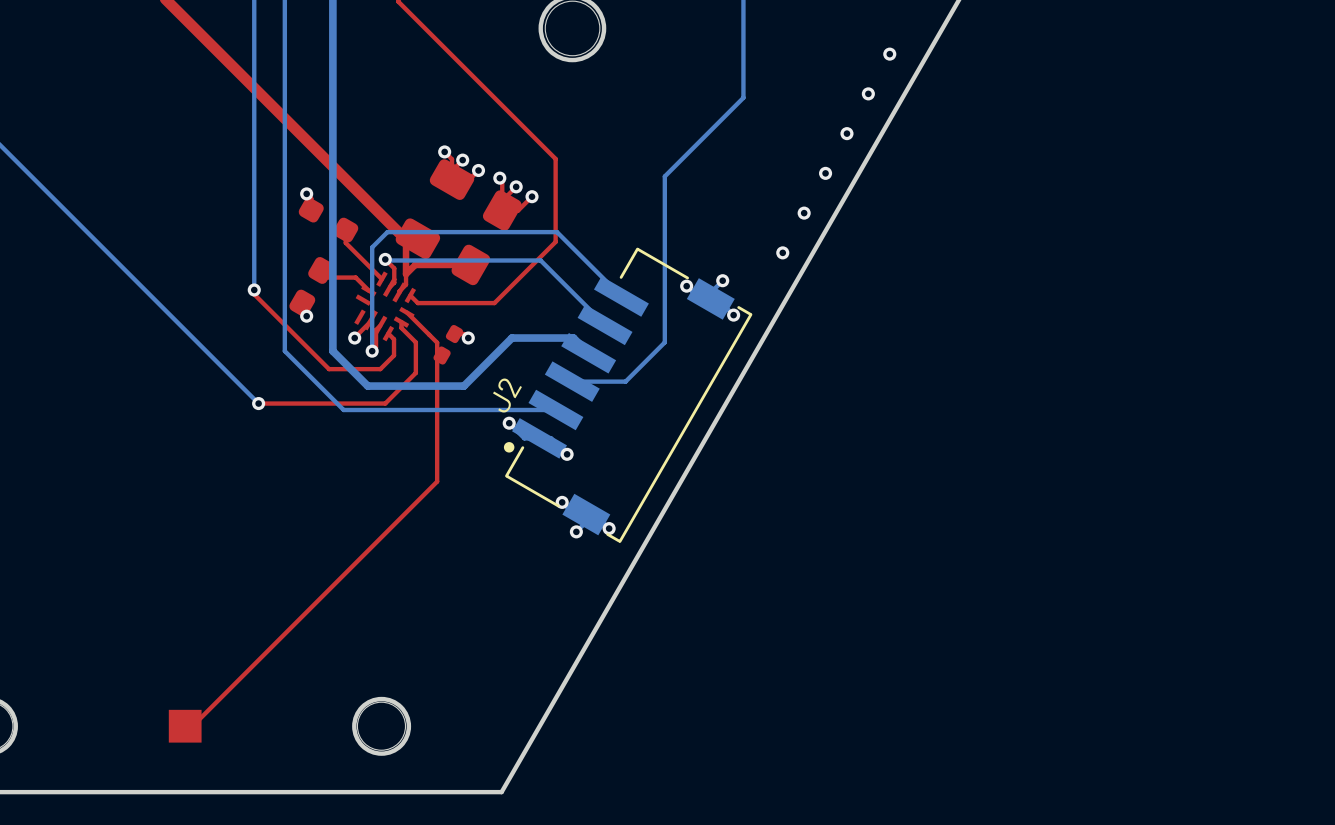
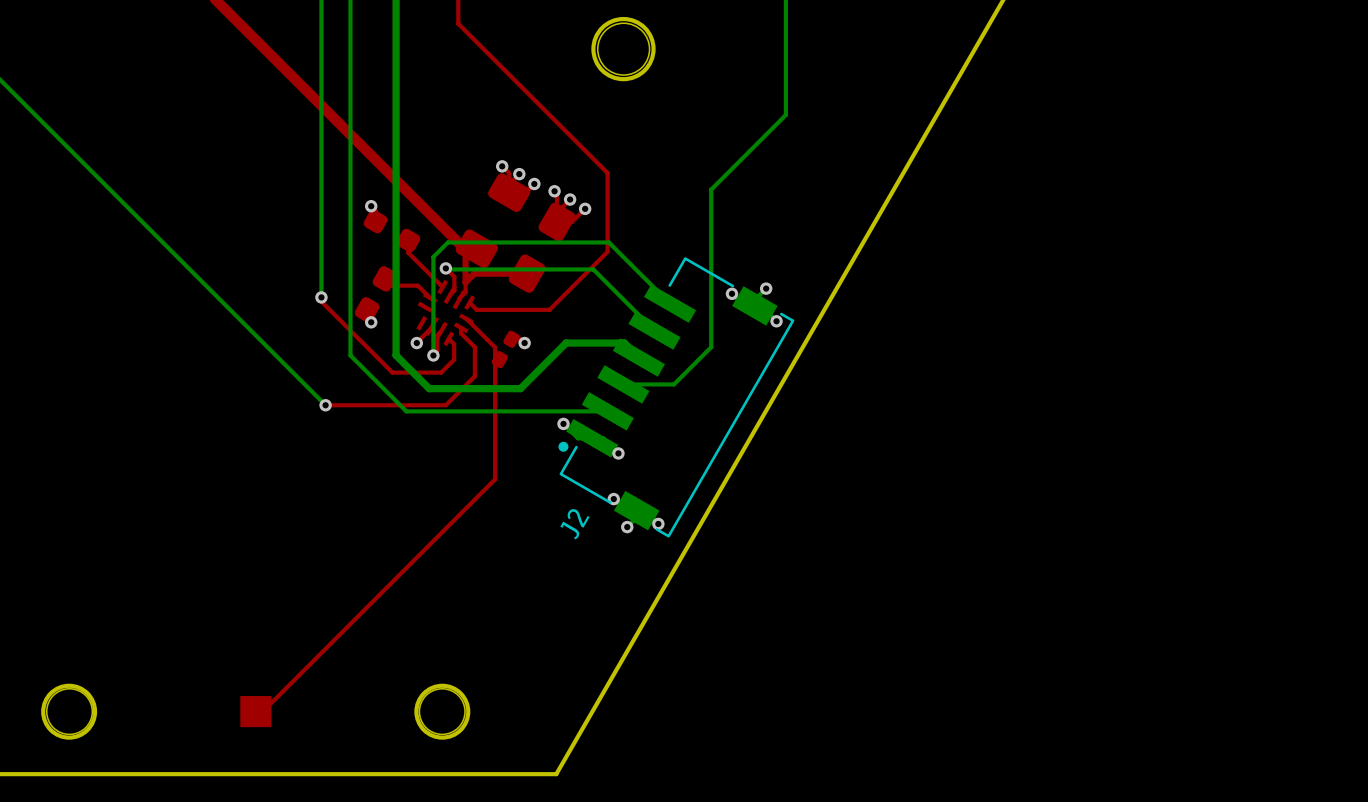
via: (889, 54) -> none
via: (868, 93) -> none
via: (846, 133) -> none
via: (825, 173) -> none
via: (804, 213) -> none
via: (782, 252) -> none
J2 name position: J2 (507, 395) -> J2 (574, 524)

